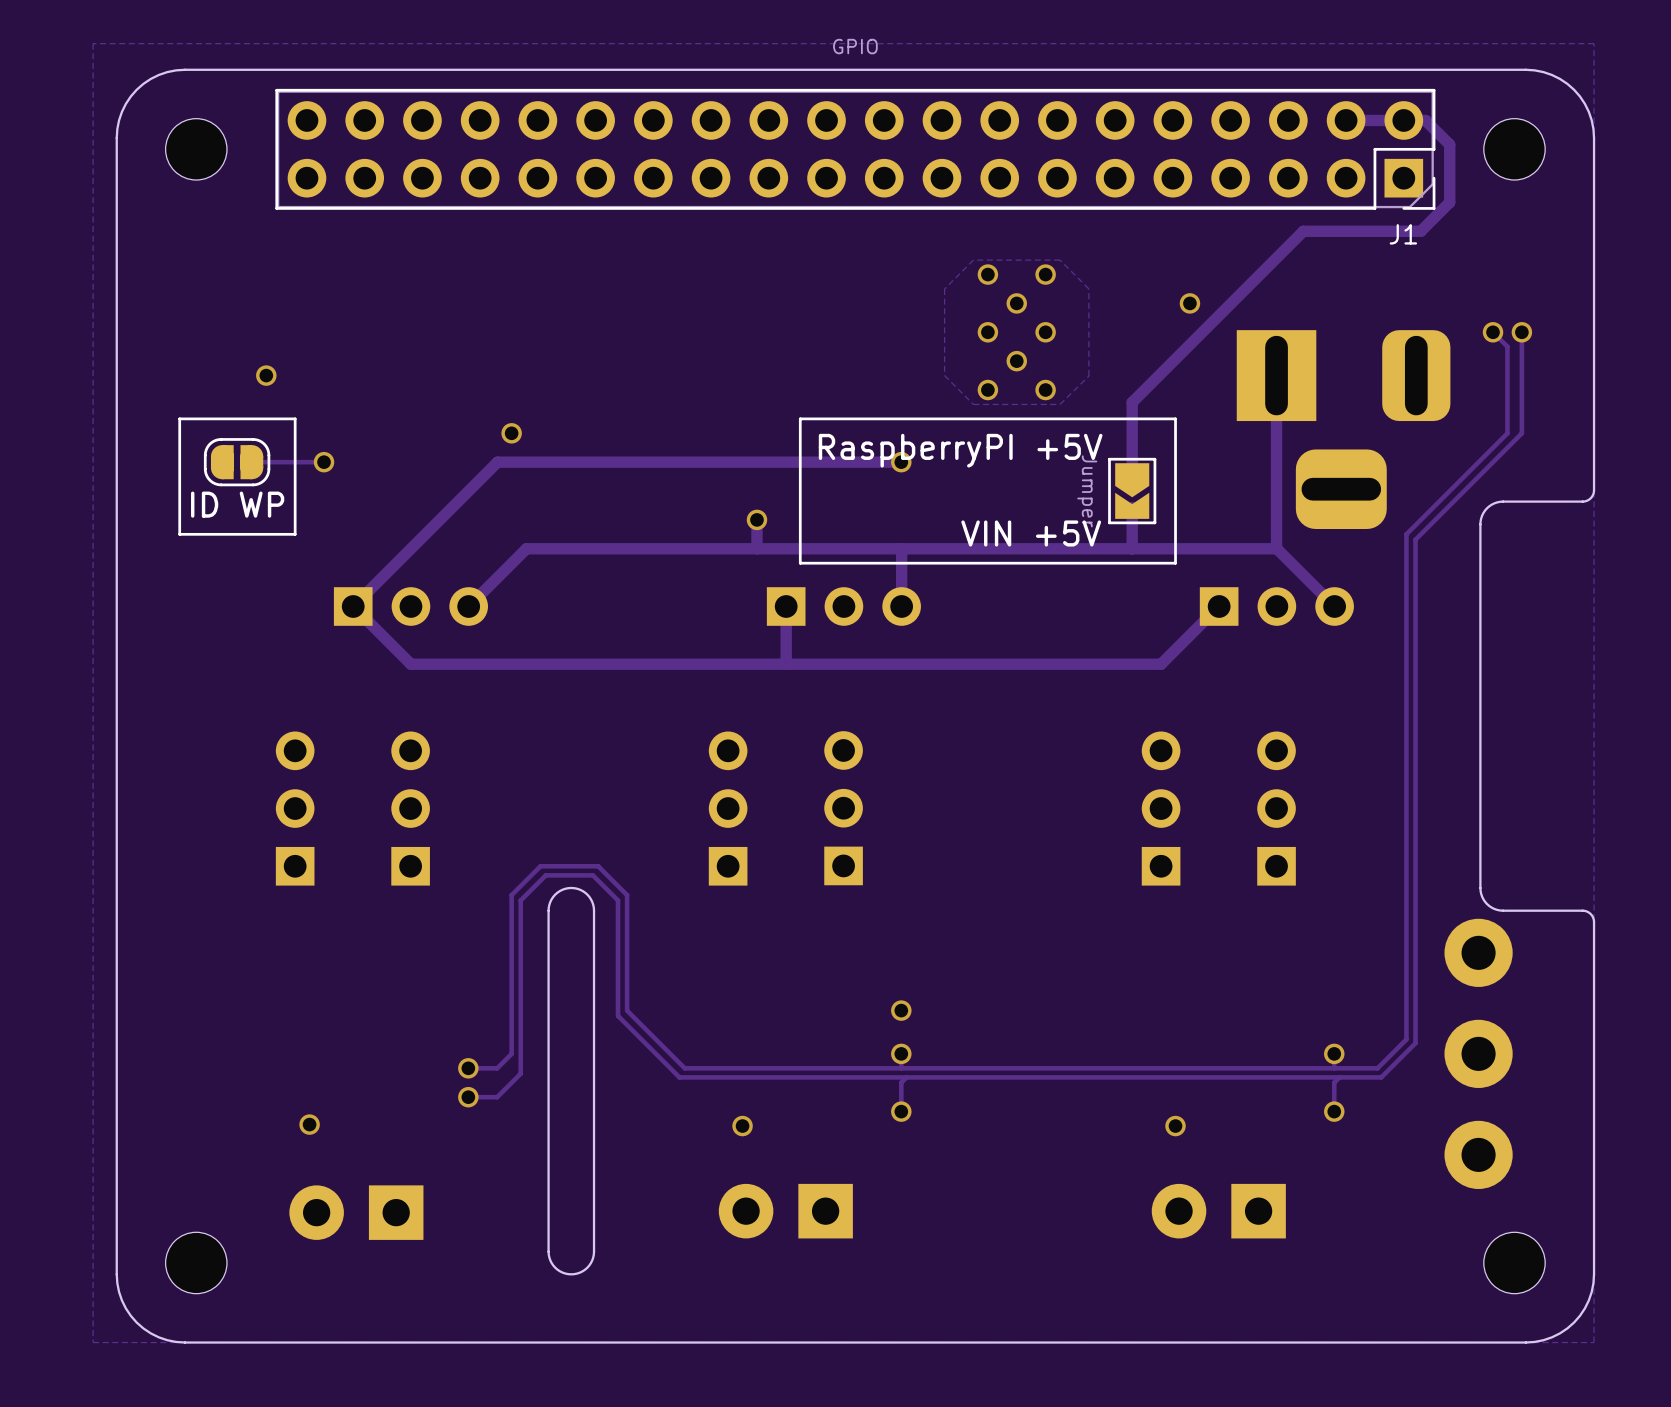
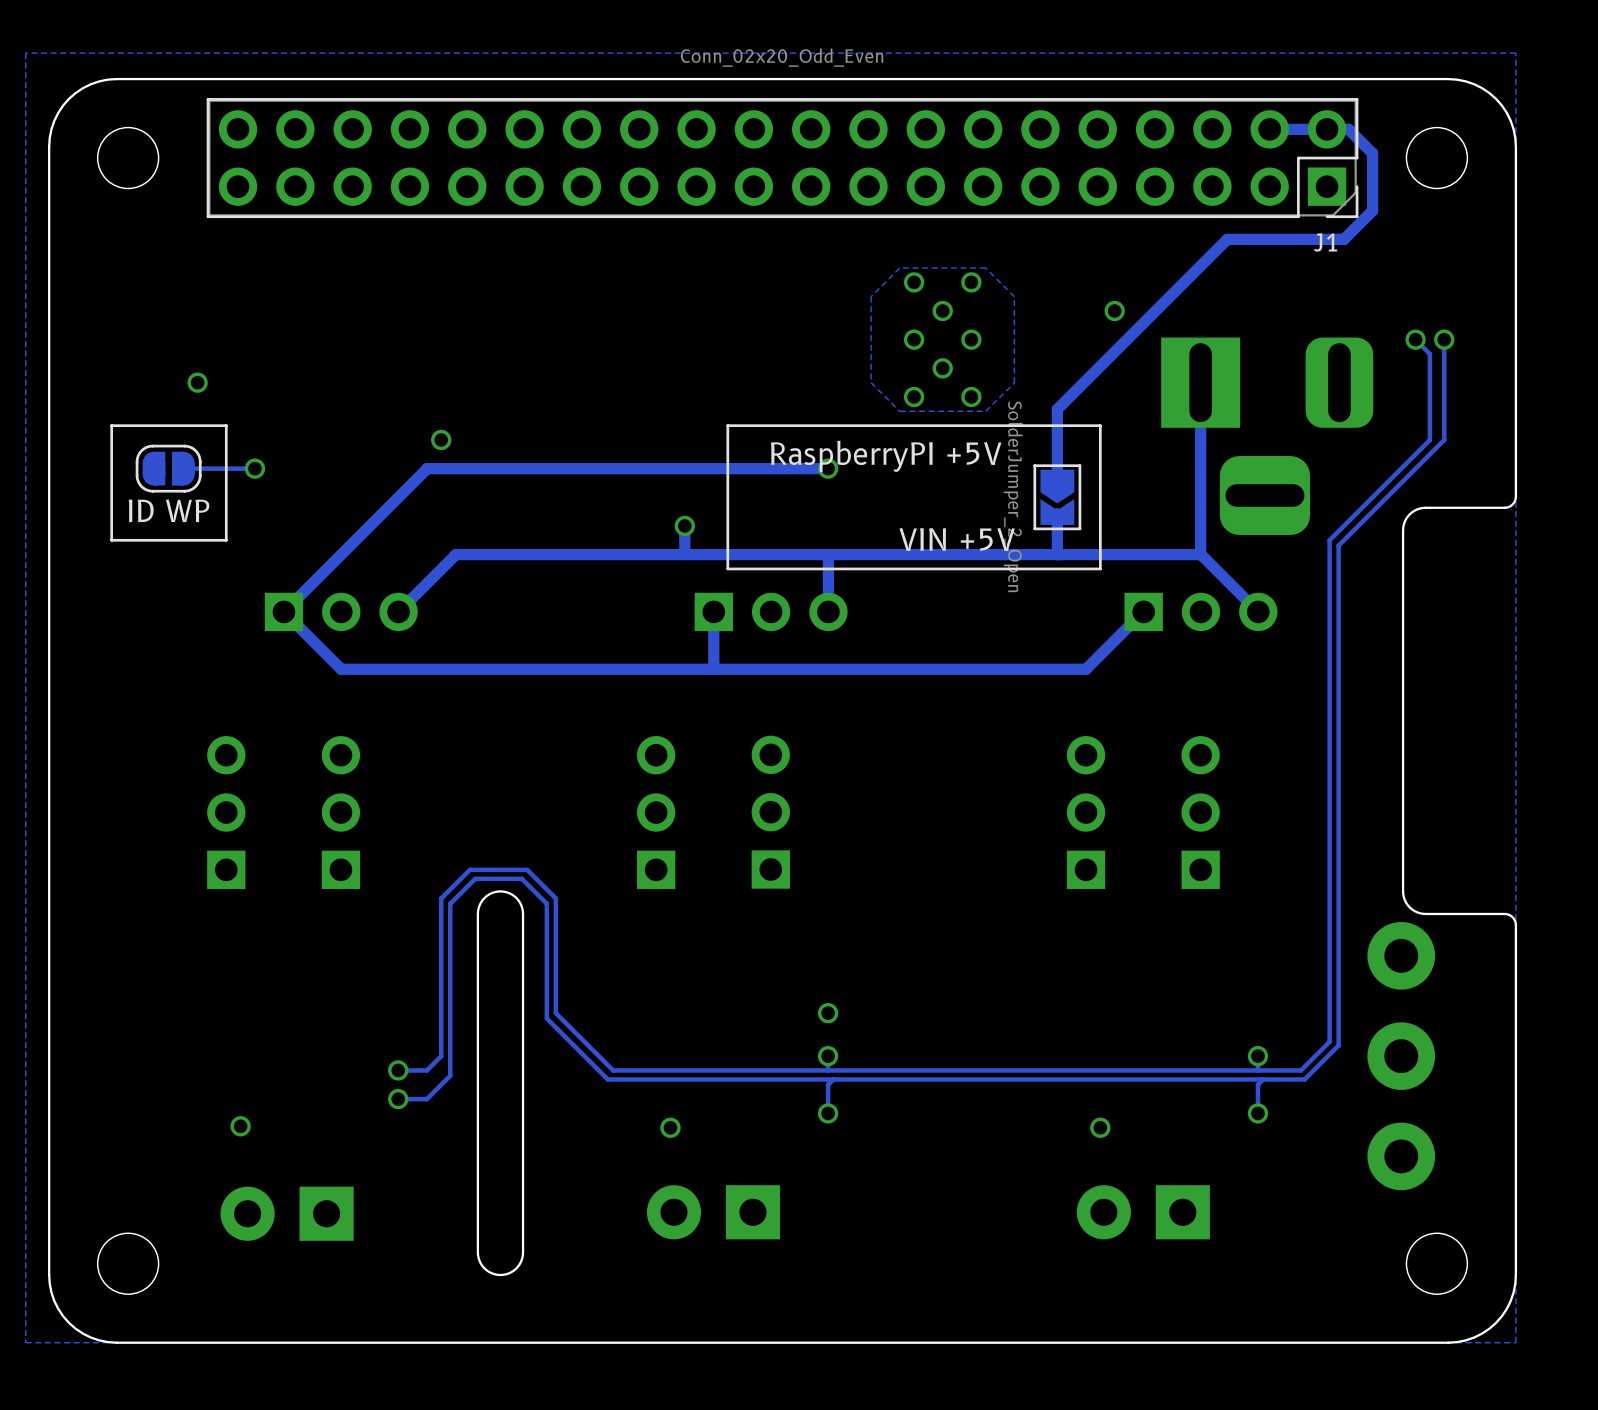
J1 value: GPIO (855, 46) -> Conn_02x20_Odd_Even (782, 57)
part value: Jumper (1087, 491) -> SolderJumper_2_Open (1013, 496)

